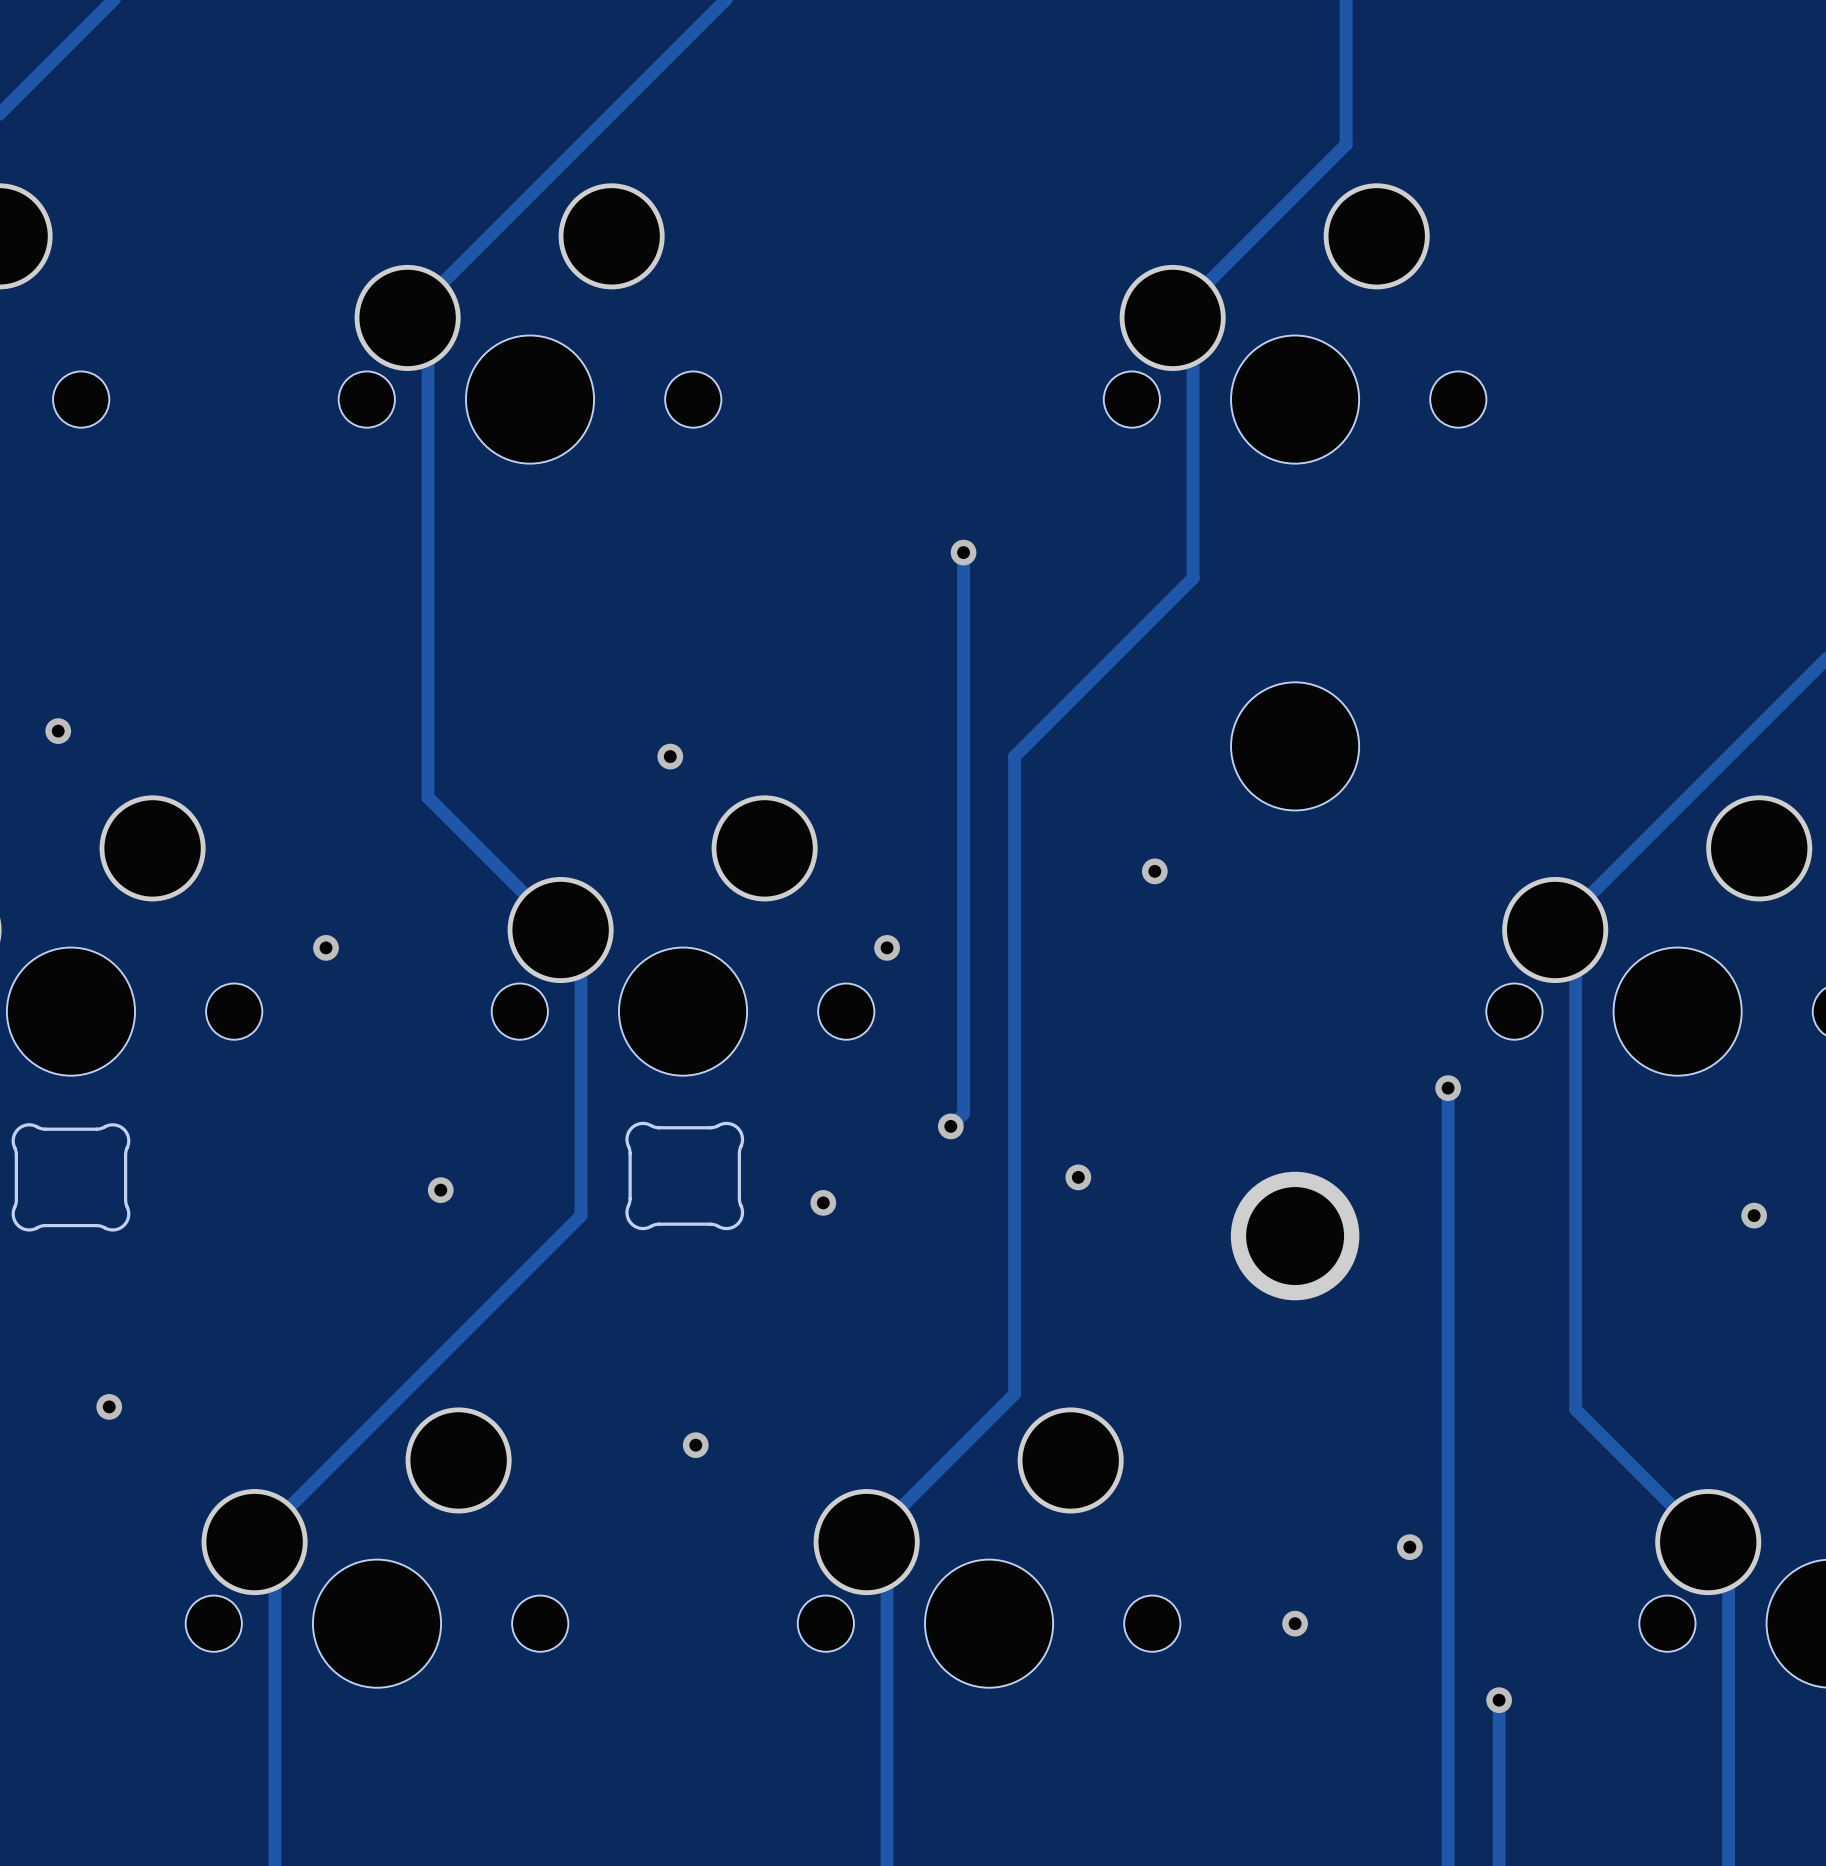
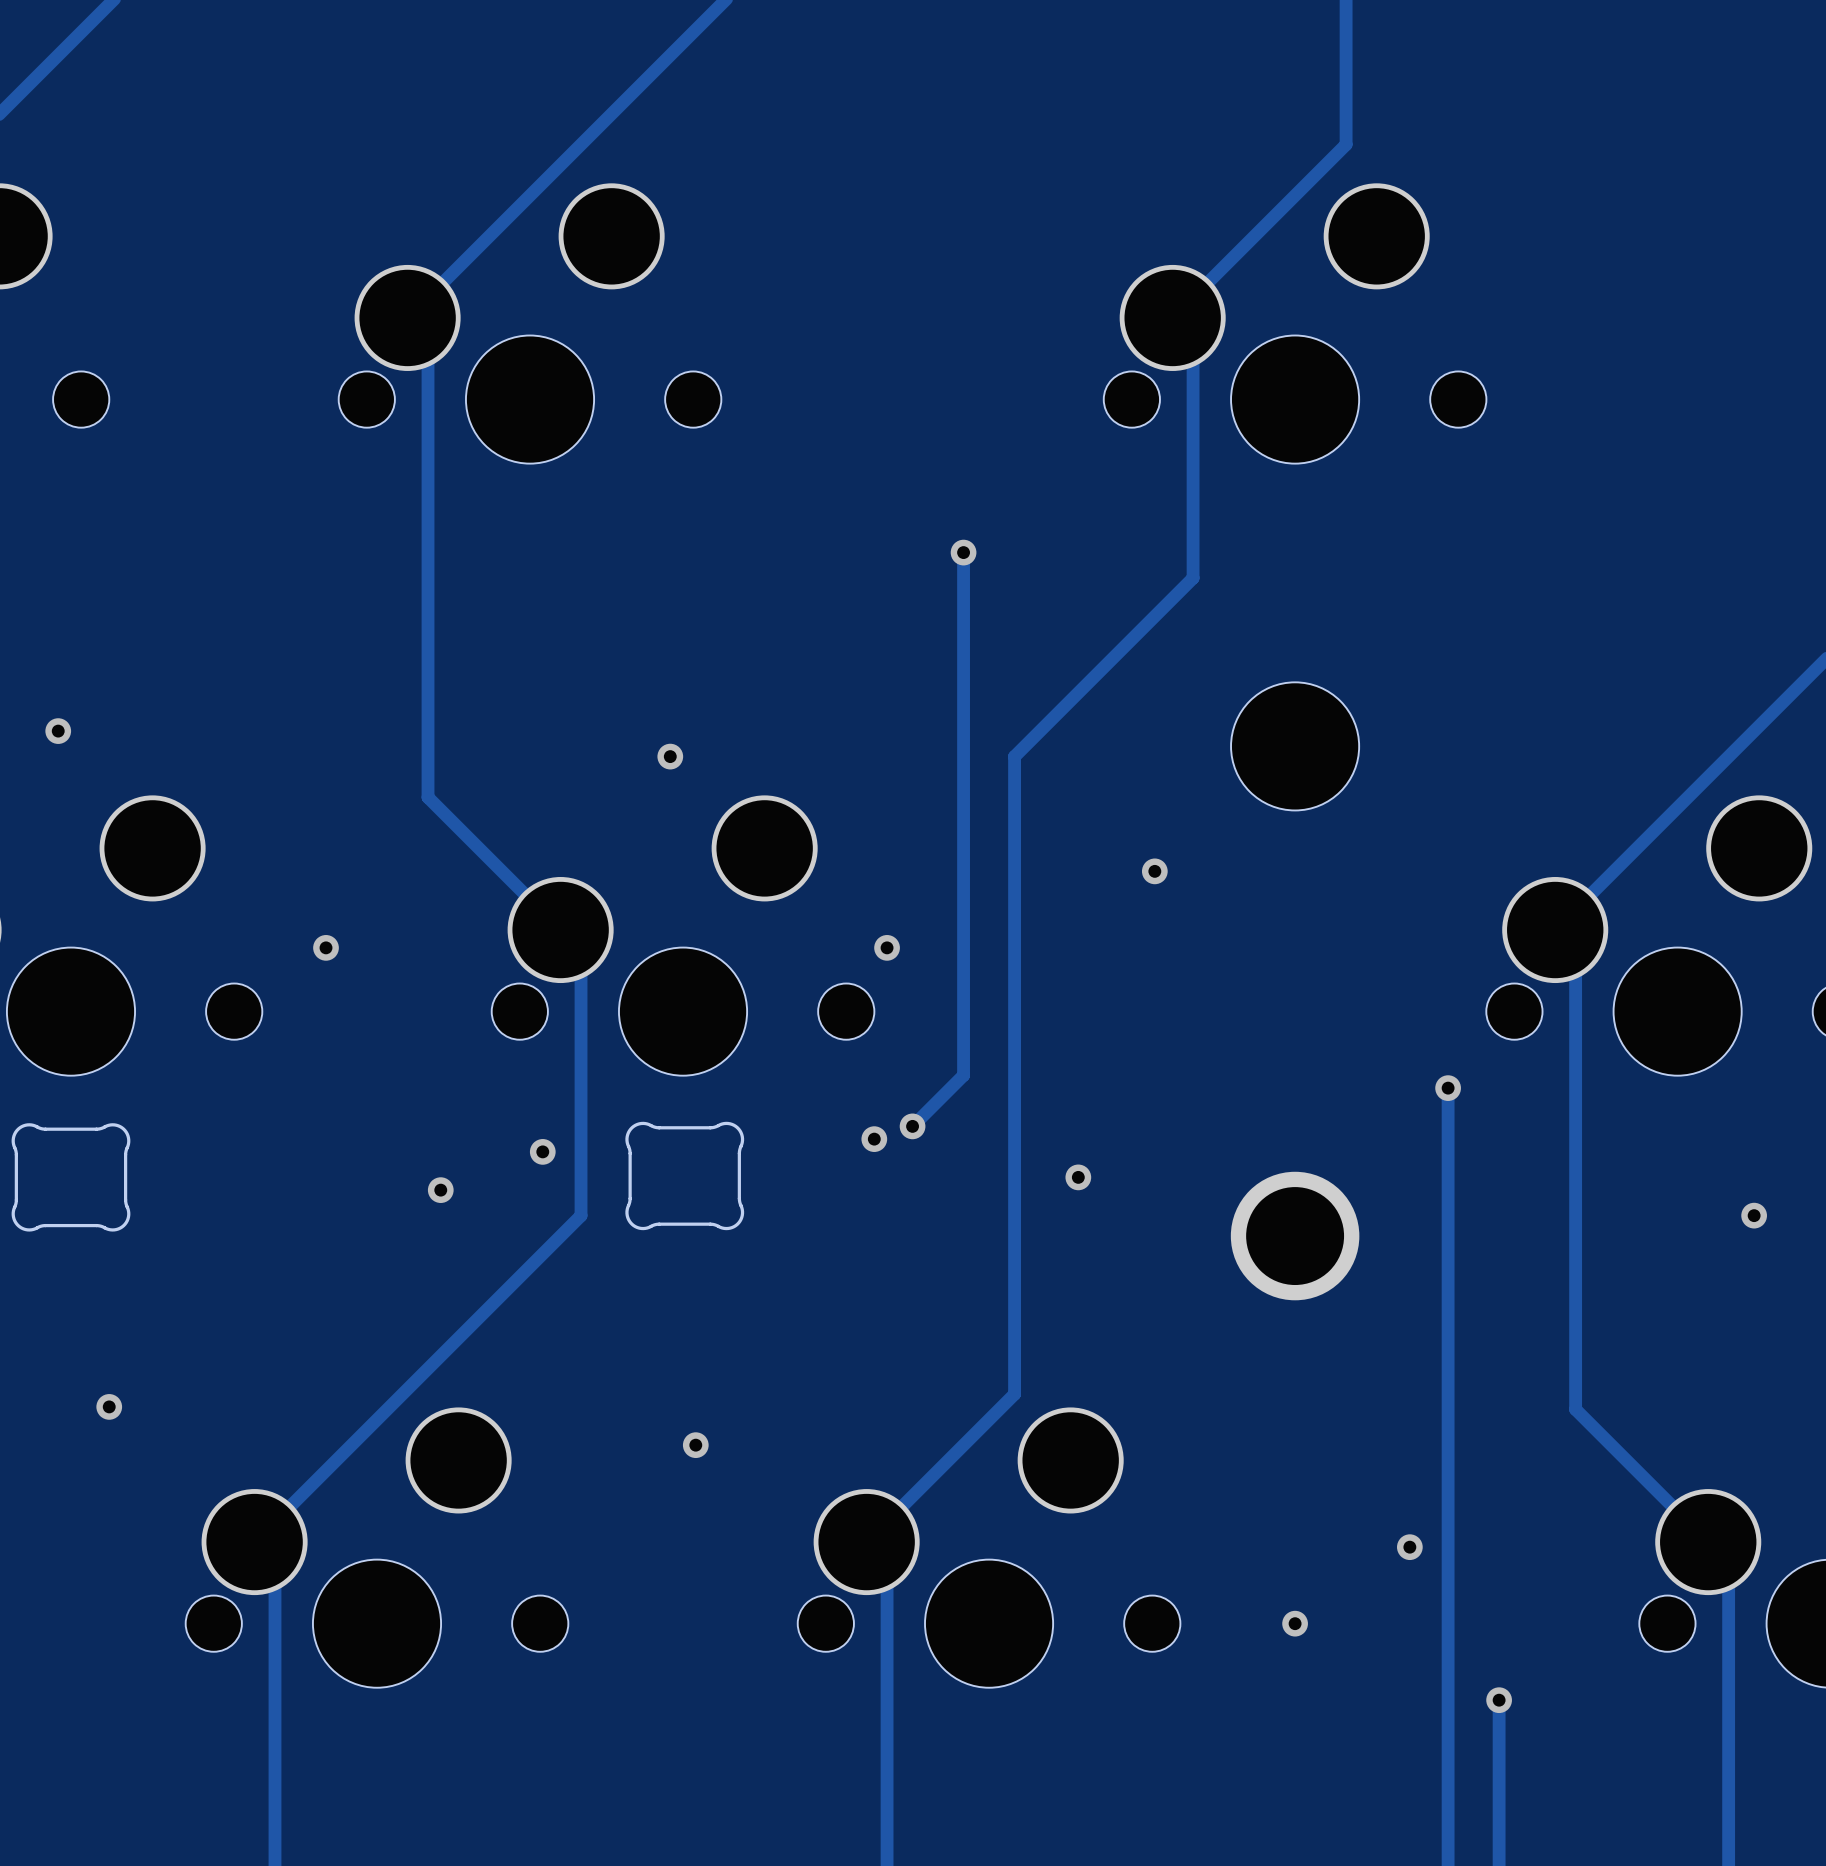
track: (963, 1075) (963, 1113) (950, 1126) -> (963, 1075) (912, 1126)
via position: (950, 1126) -> (912, 1126)
via: none -> (874, 1139)
via: none -> (542, 1151)
via: (823, 1202) -> none

